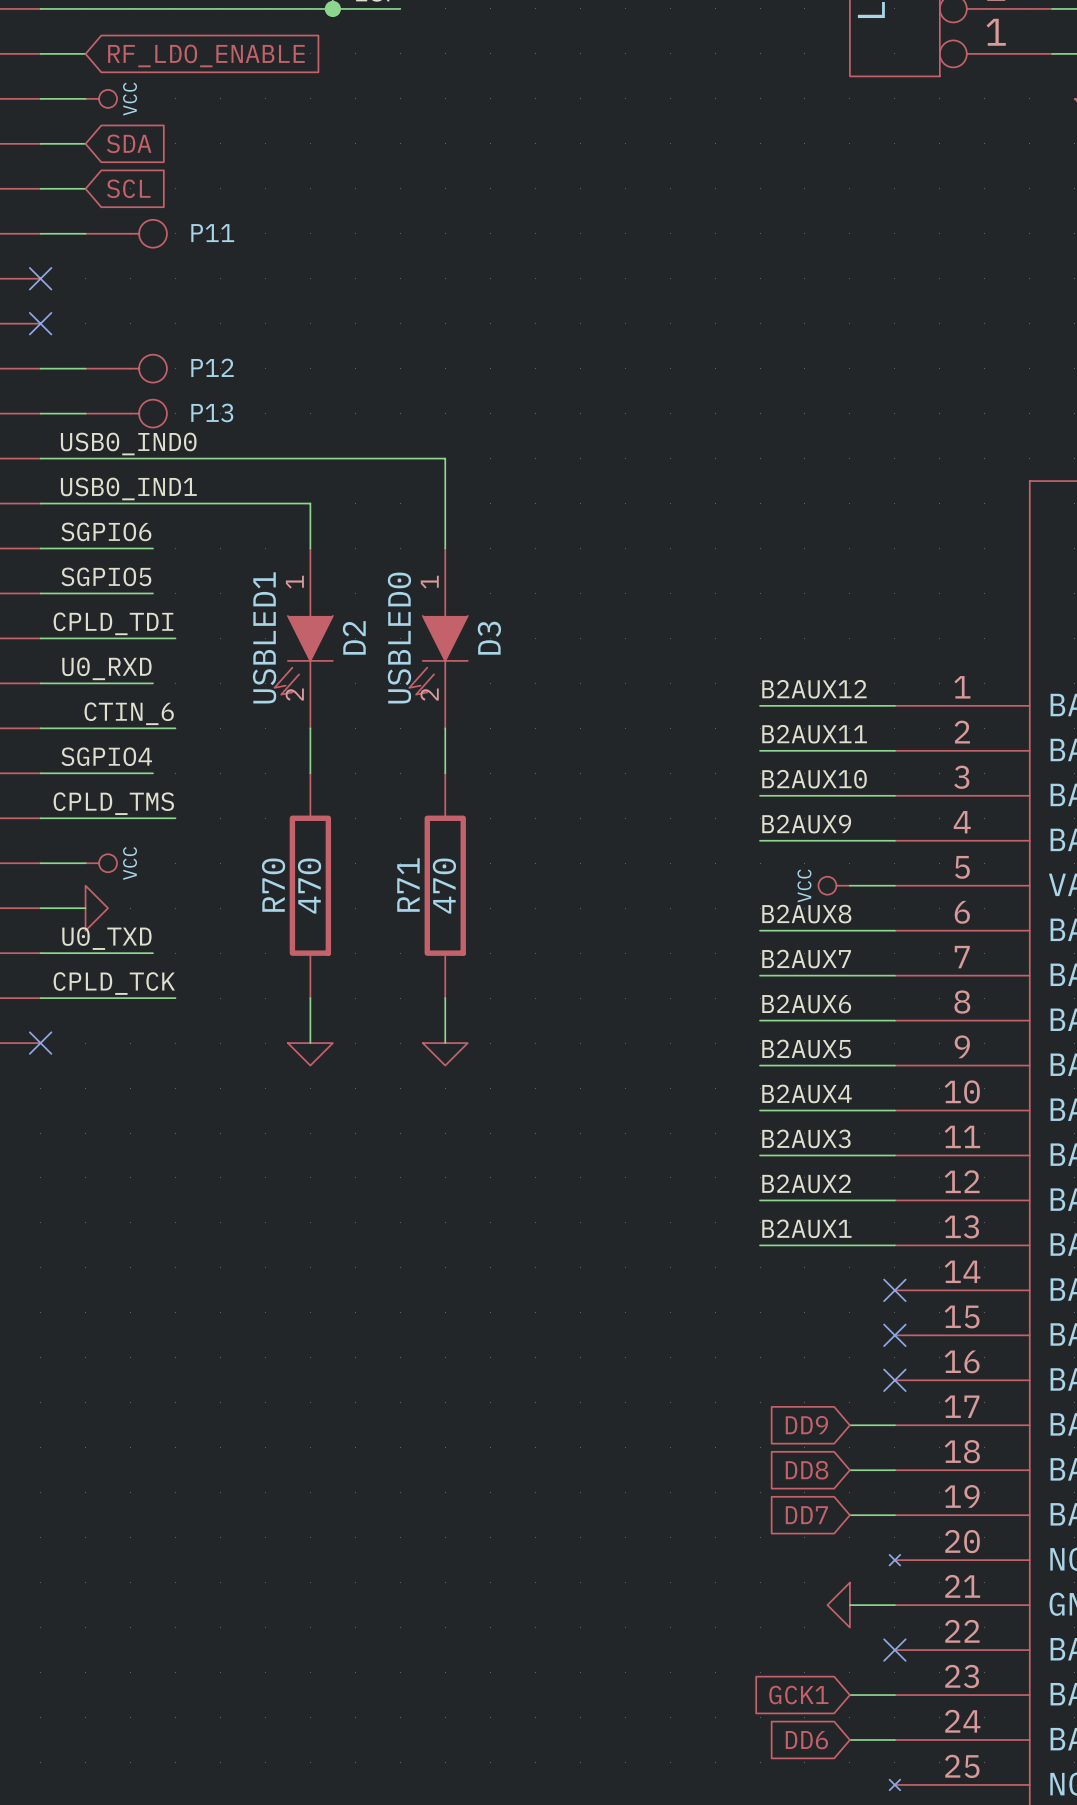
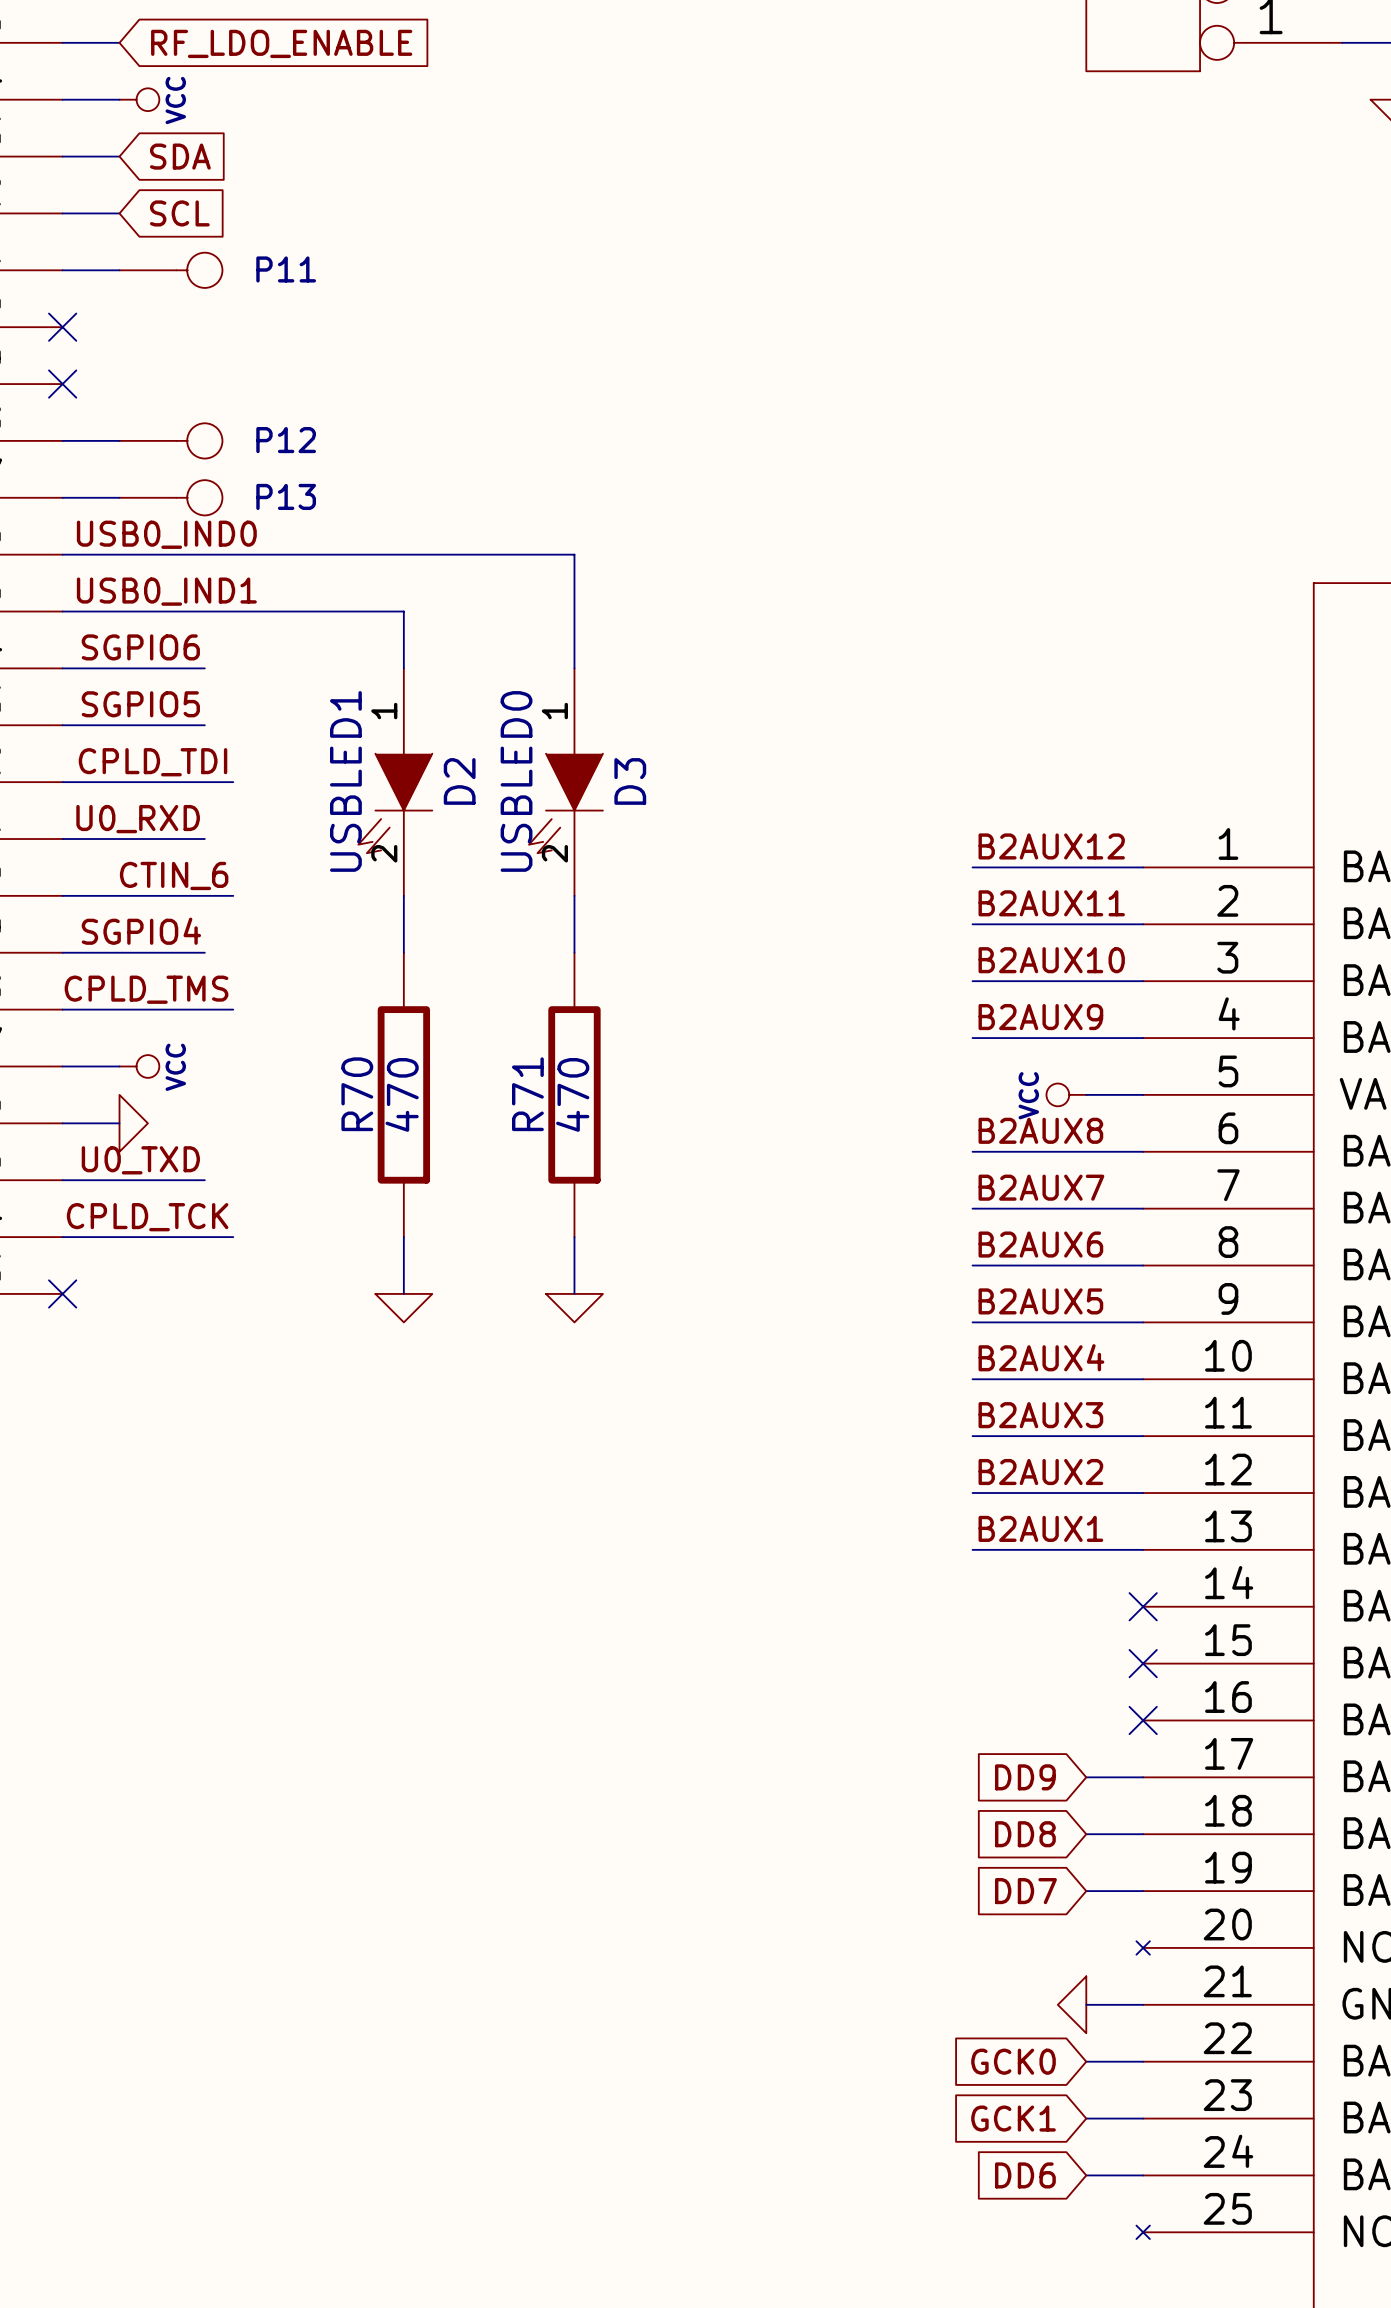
global label: none -> GCK0 (1013, 2061)
wire: none -> (1086, 2061) (1143, 2061)
no-connect mark: (894, 1650) -> none

